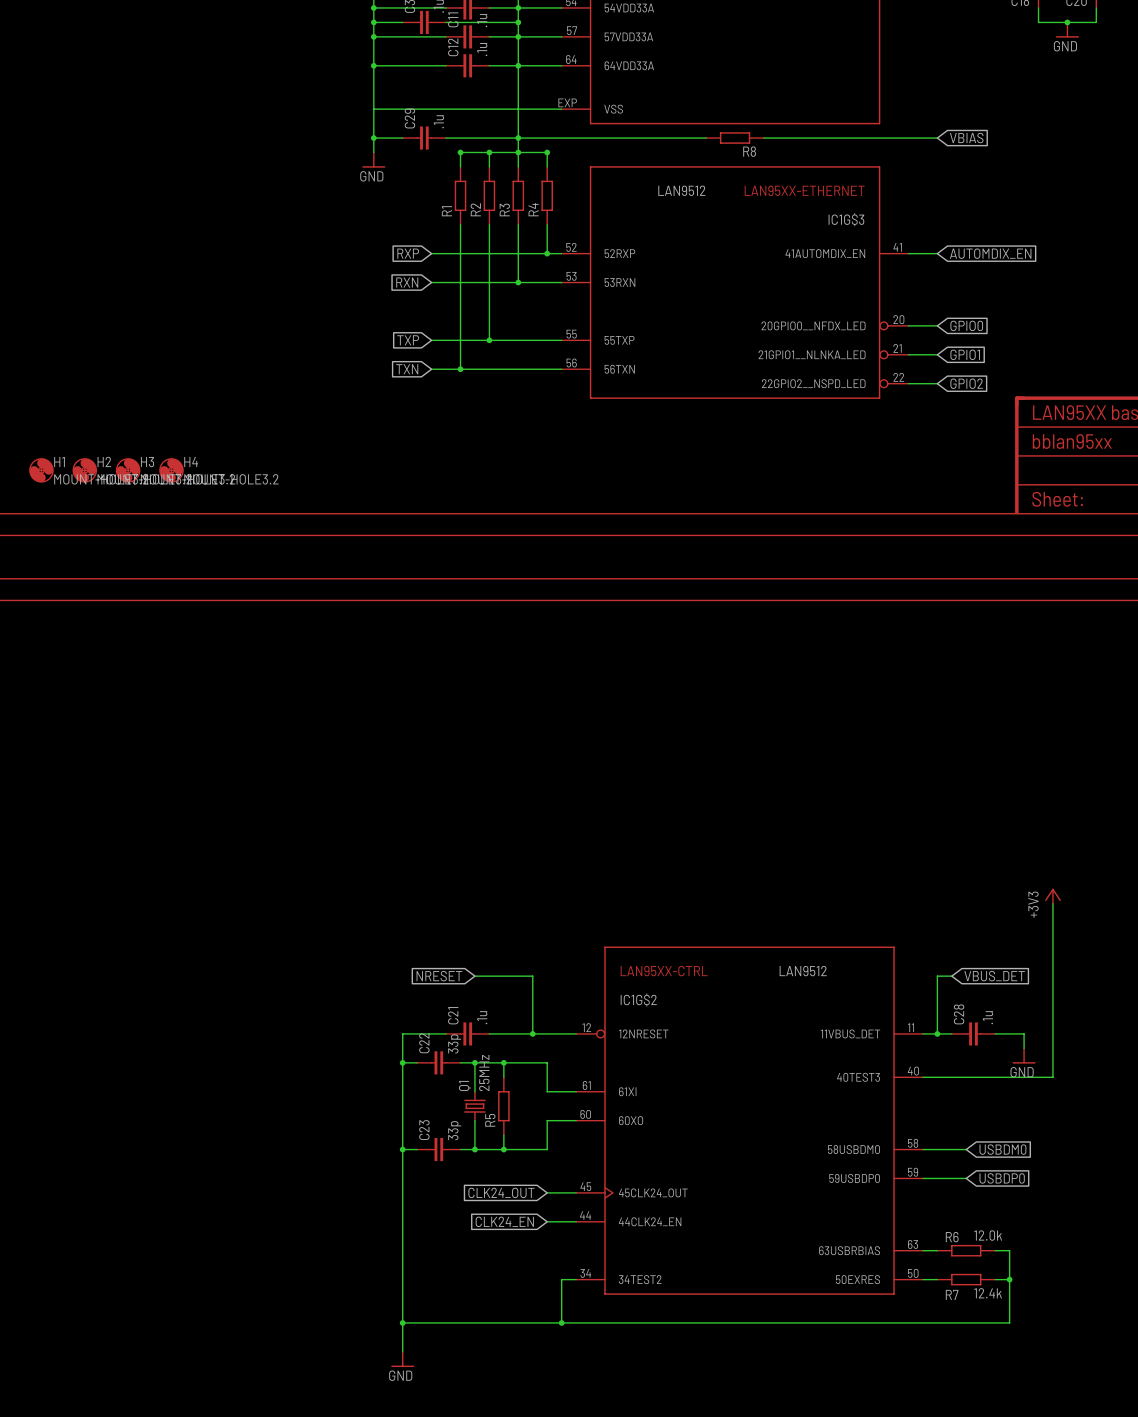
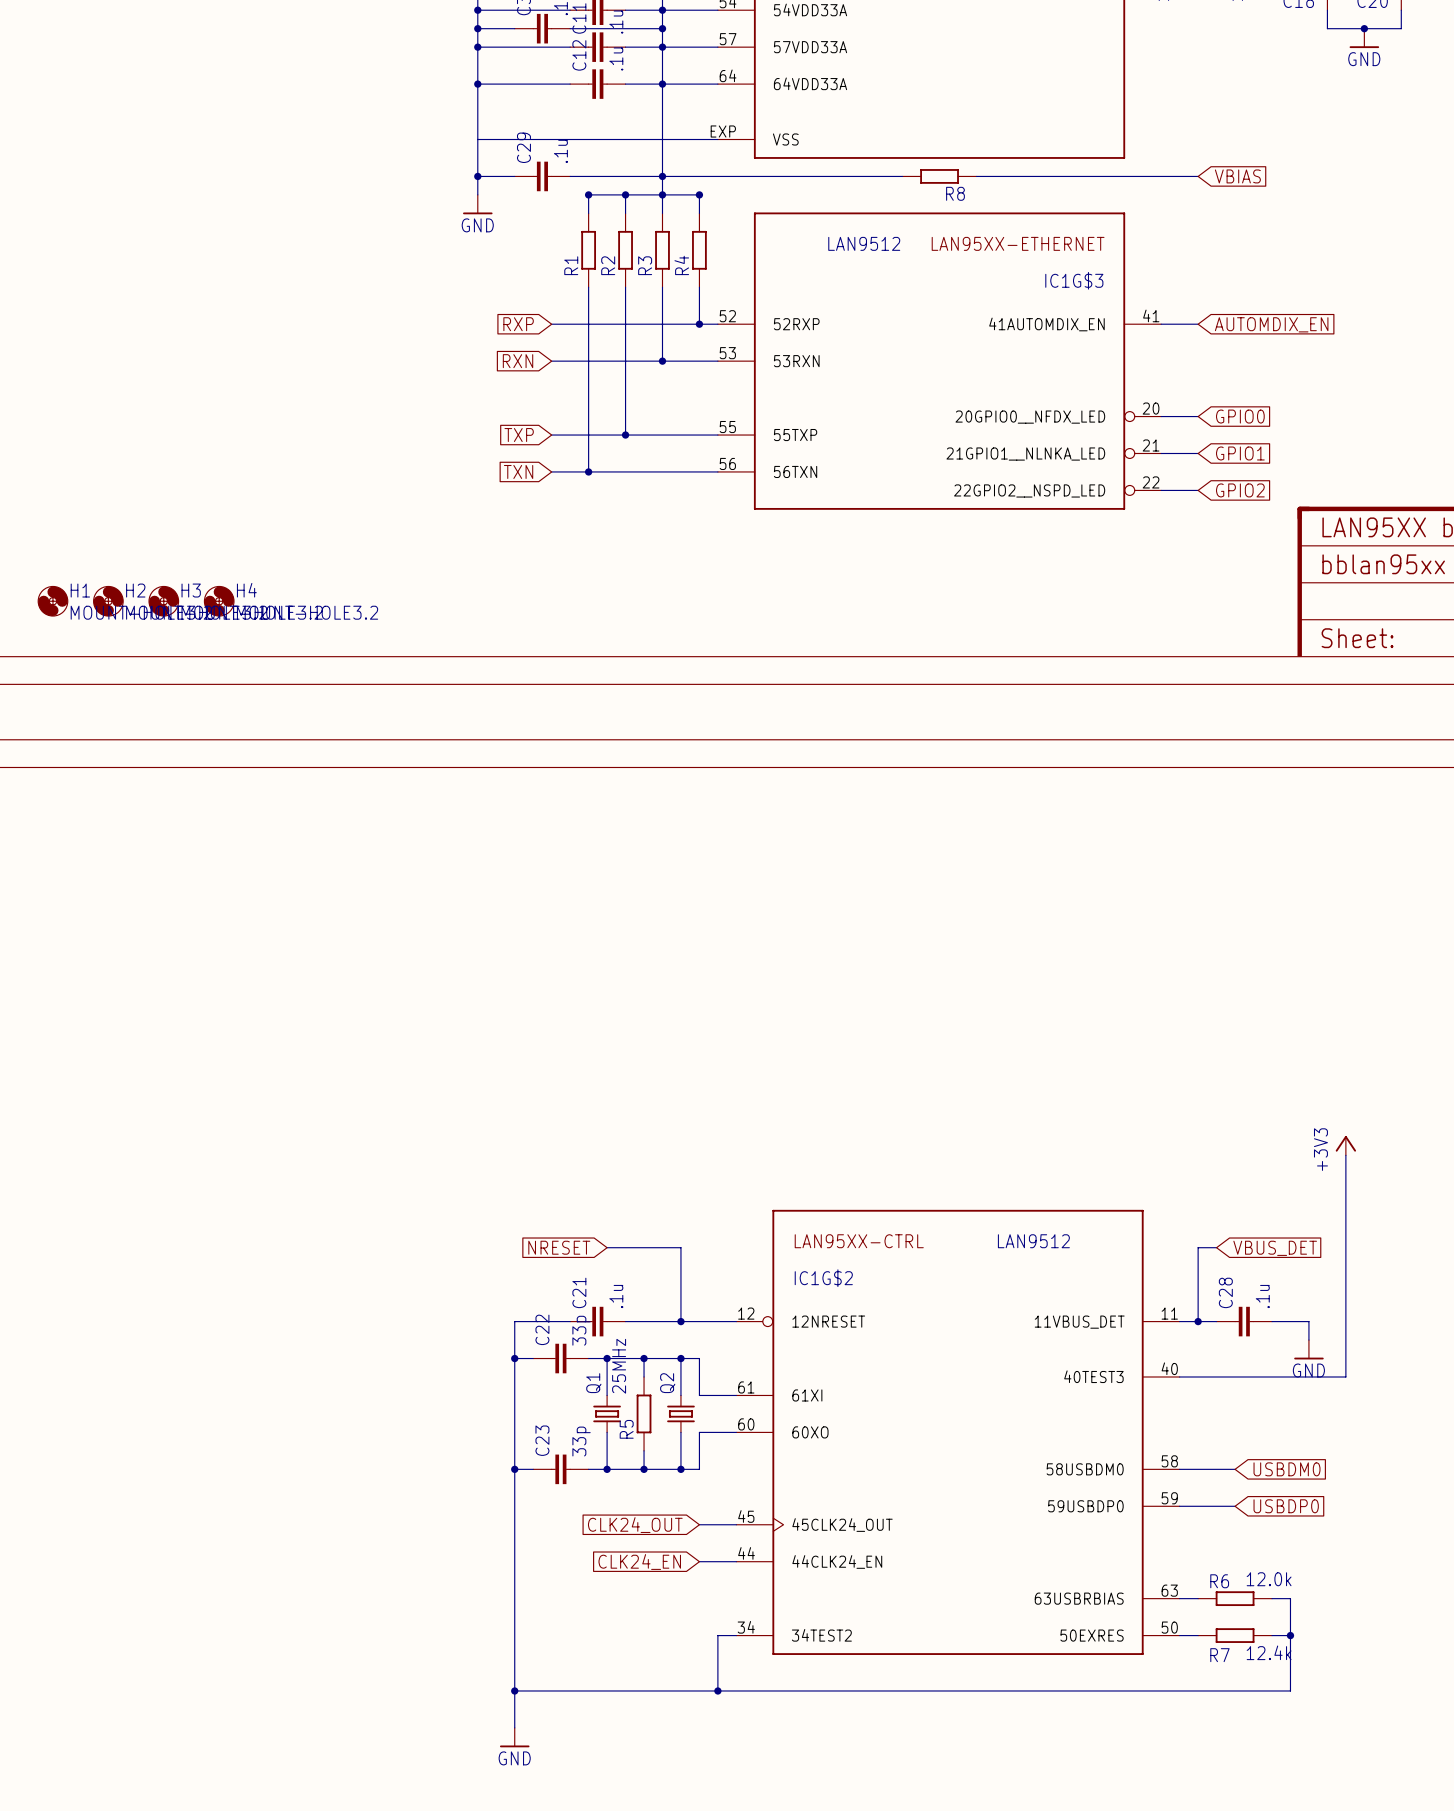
wire: none -> (680, 1358) (680, 1395)
junction: none -> (680, 1358)
Q2: none -> (680, 1413)
wire: none -> (680, 1432) (680, 1469)
junction: none -> (680, 1469)

